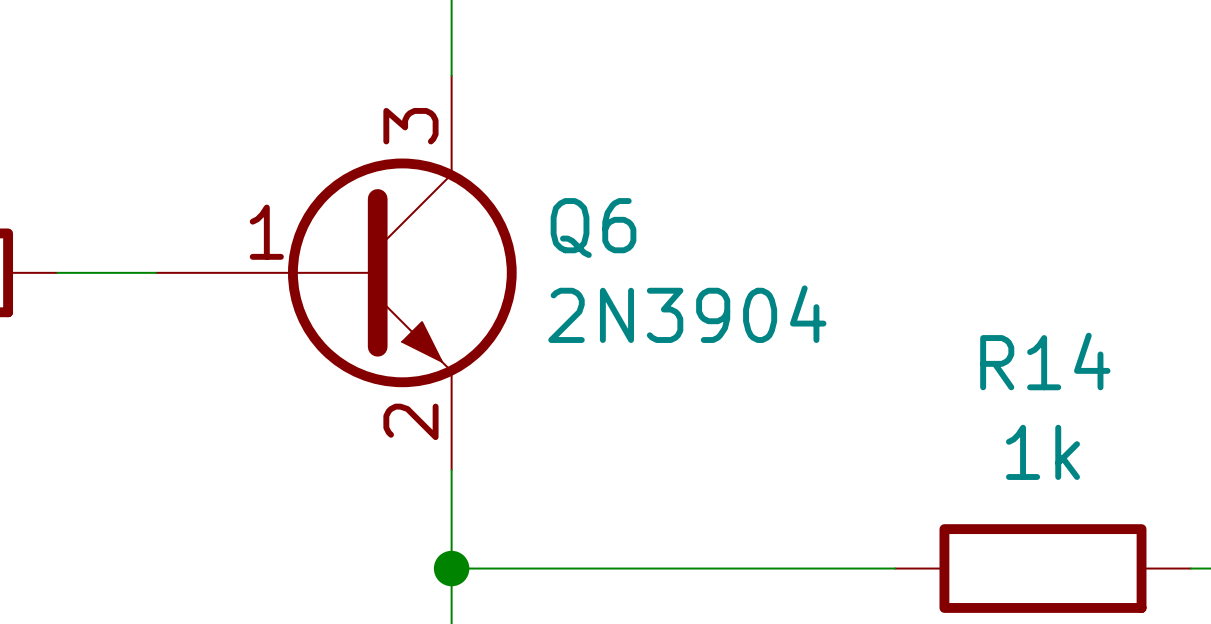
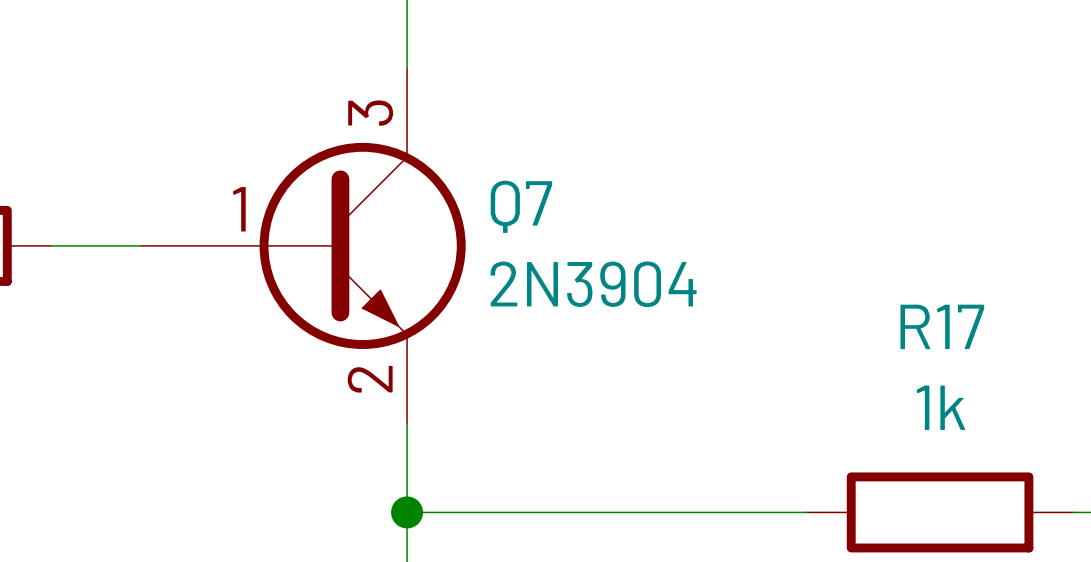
Q6 name: Q6 (593, 228) -> Q7 (521, 206)
R14 name: R14 (1045, 361) -> R17 (942, 326)

